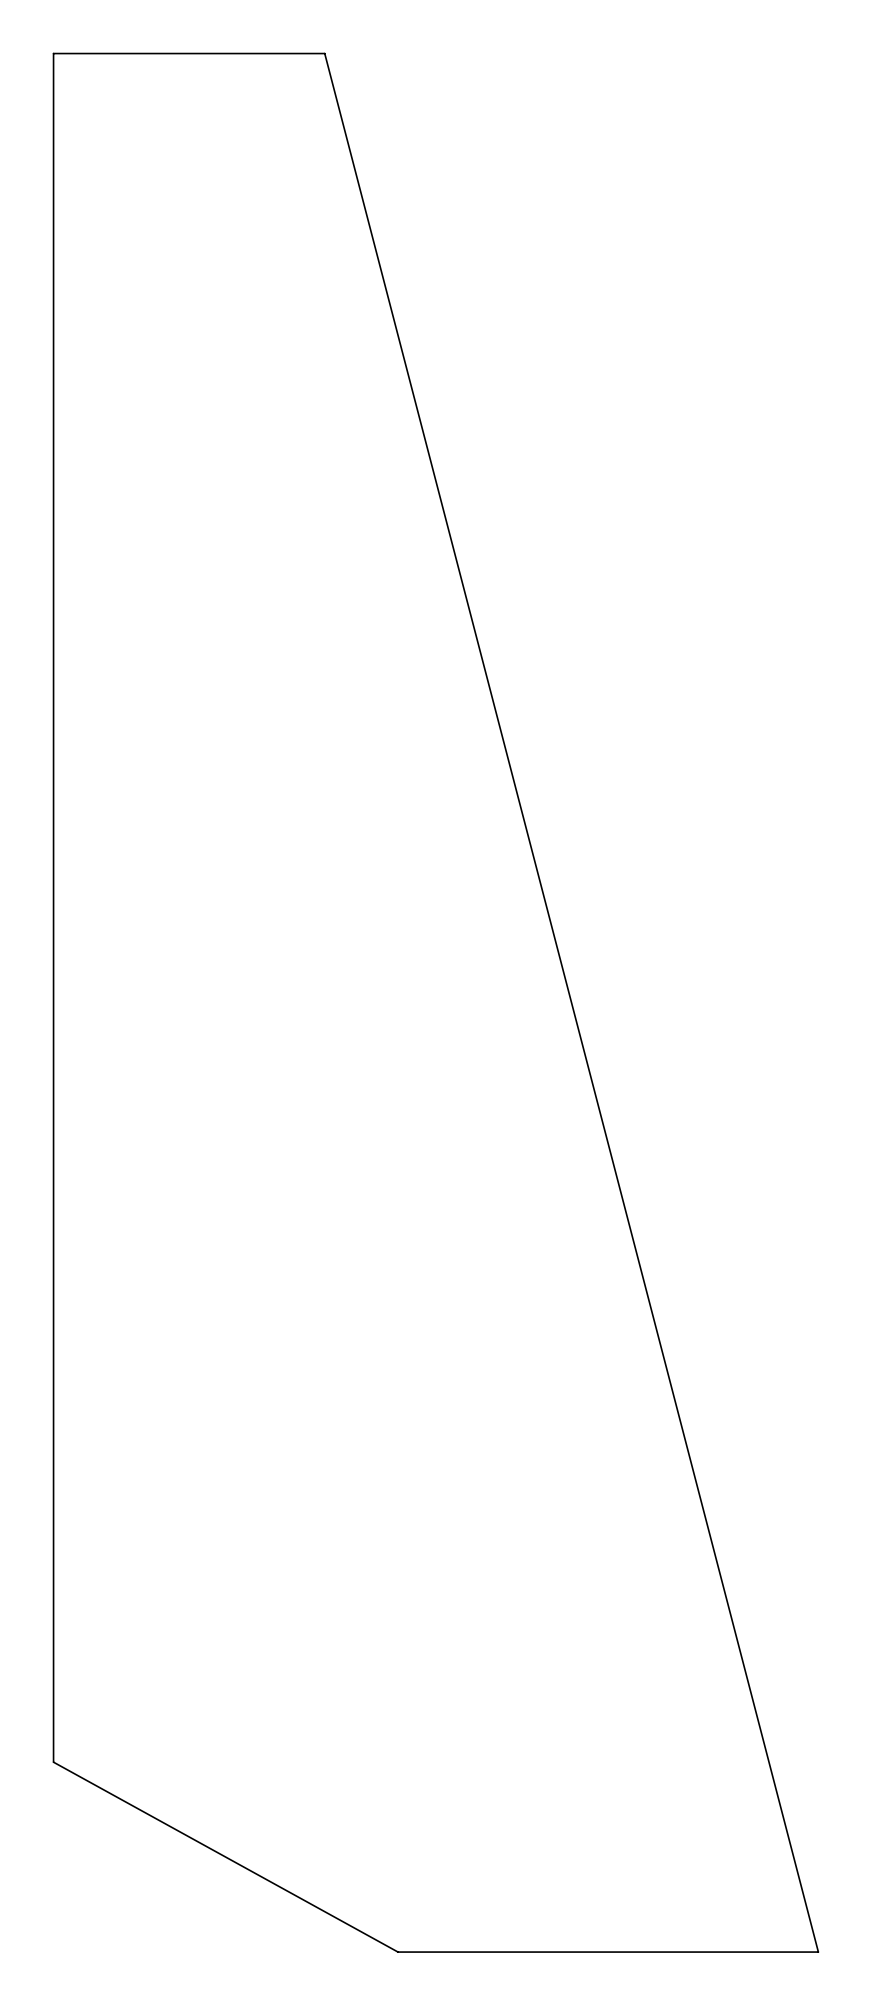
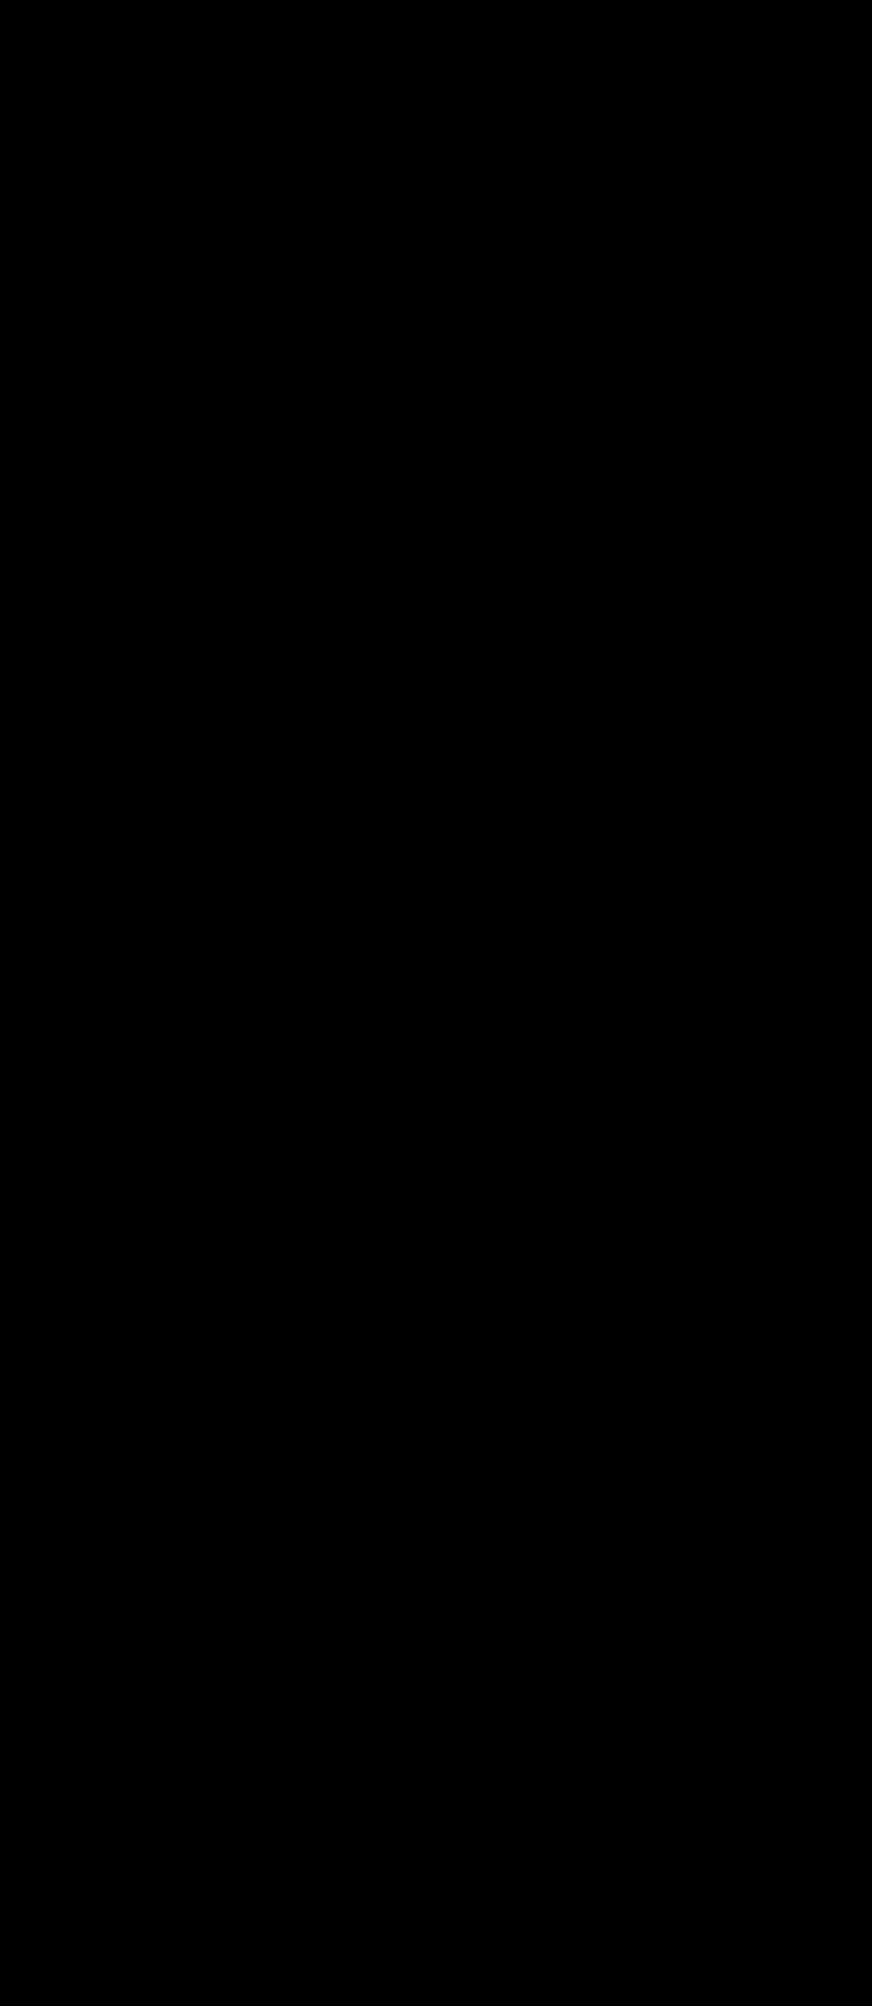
board edge: (53, 53) (53, 1762) (397, 1952) (818, 1952) (324, 53) (53, 53) -> none

